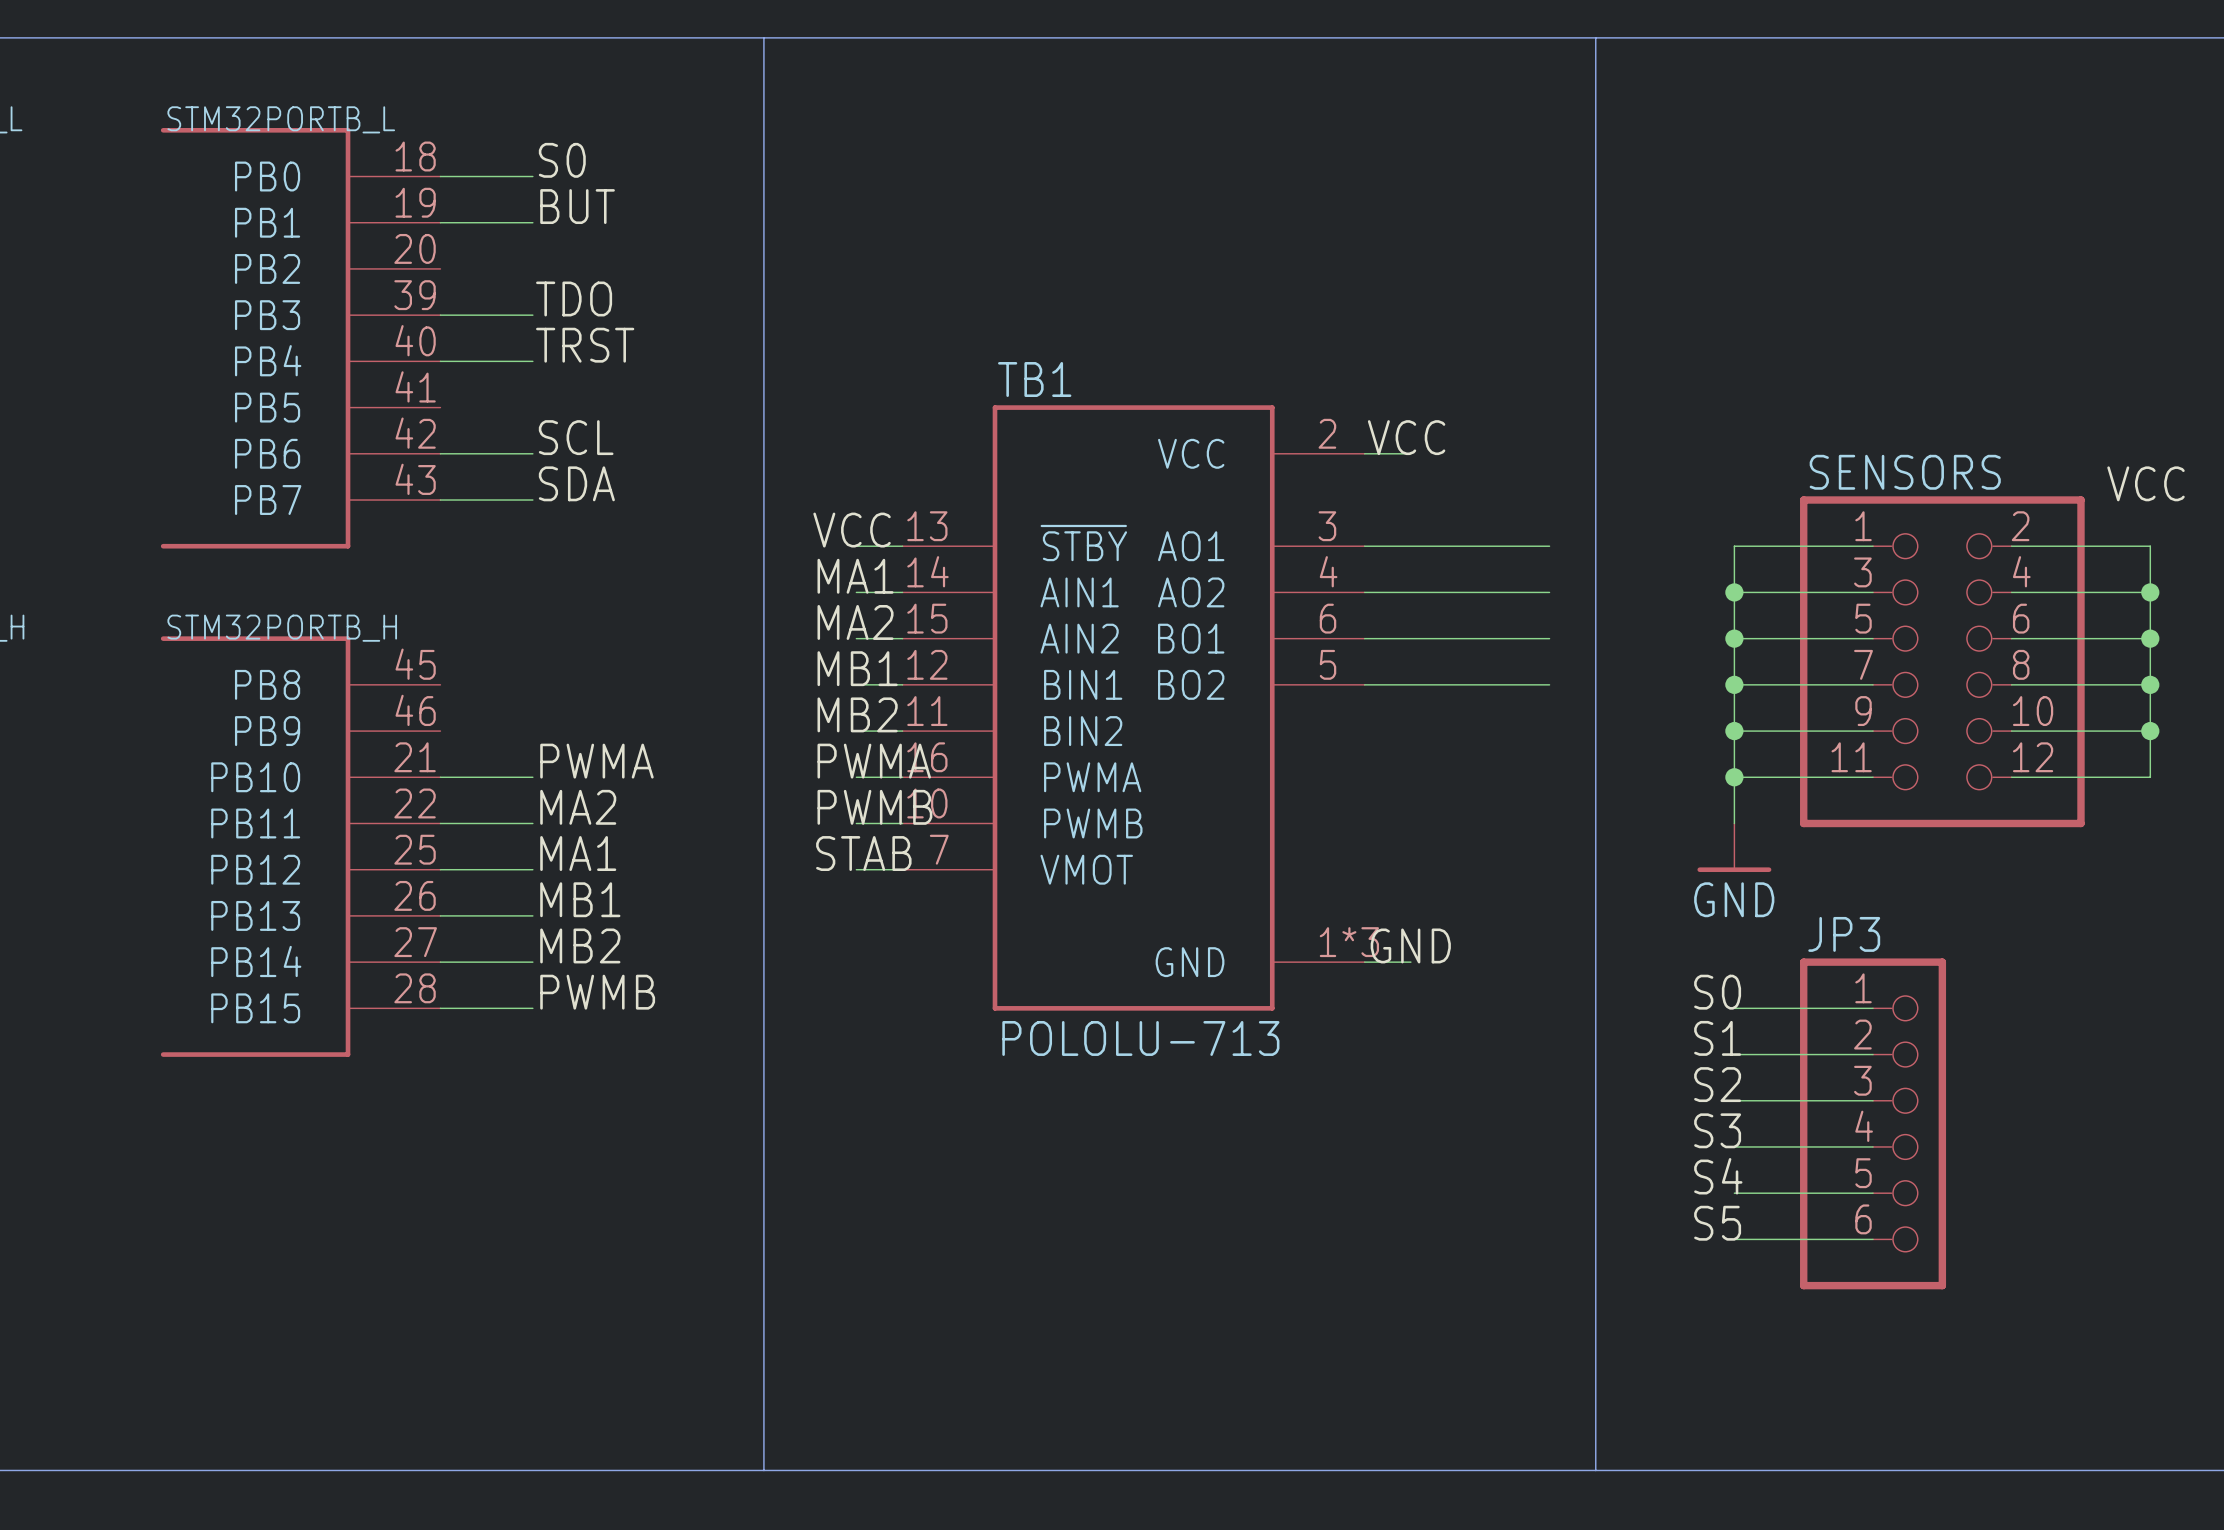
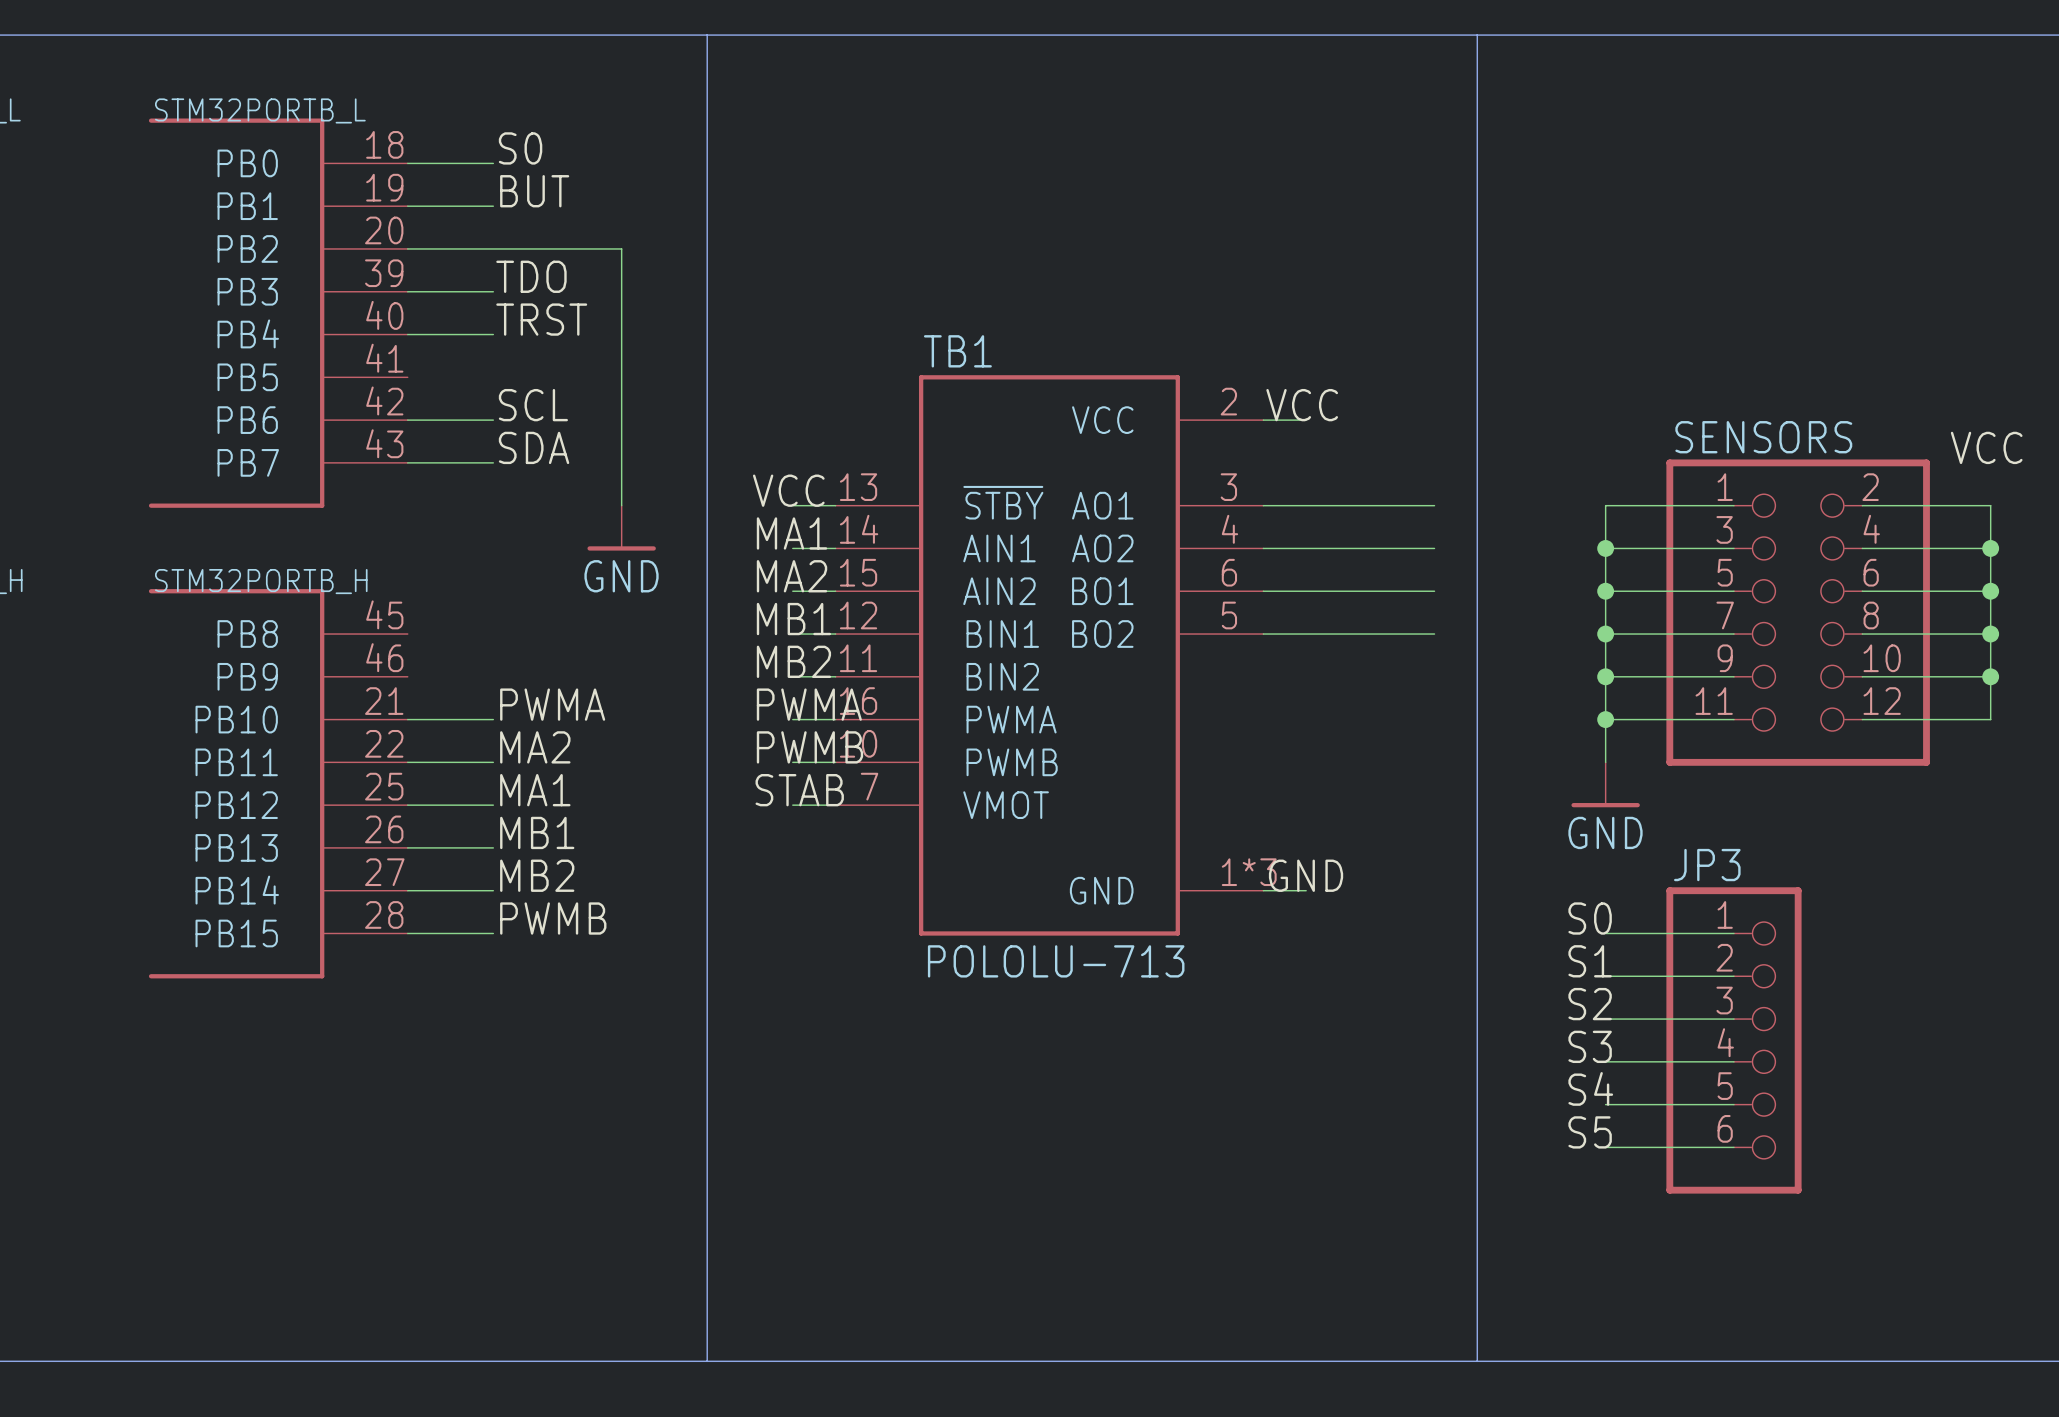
wire: none -> (407, 248) (621, 248) (621, 505)
power symbol: none -> GND (621, 528)

